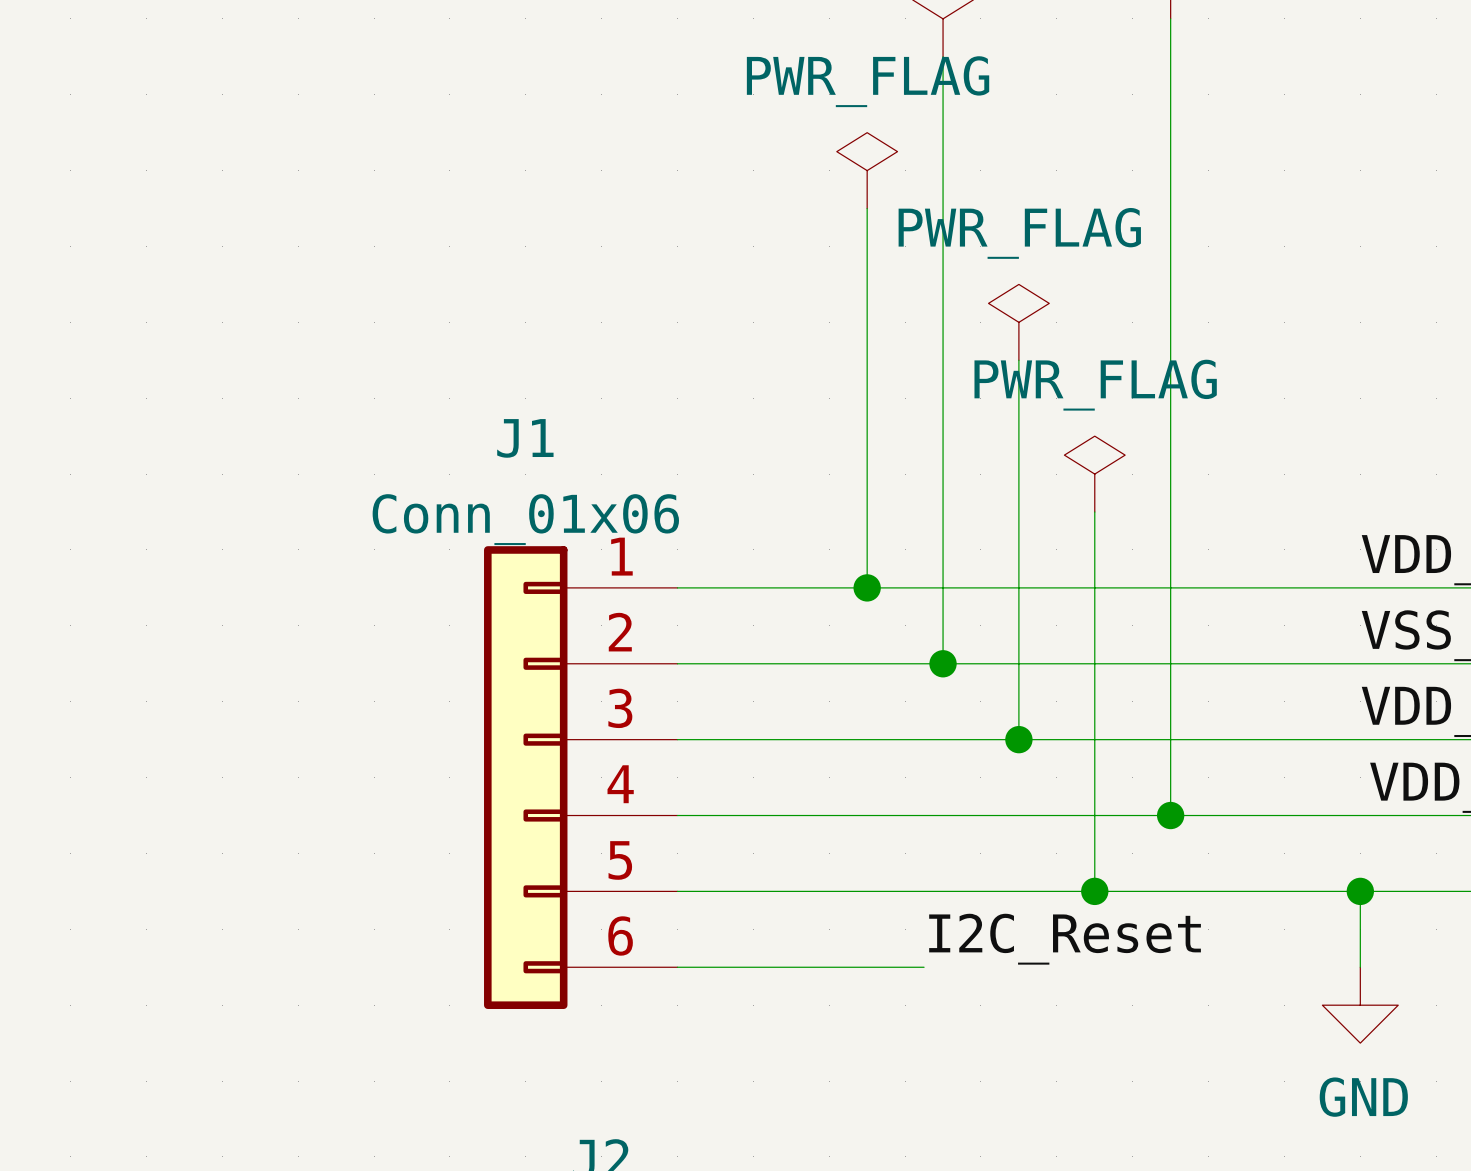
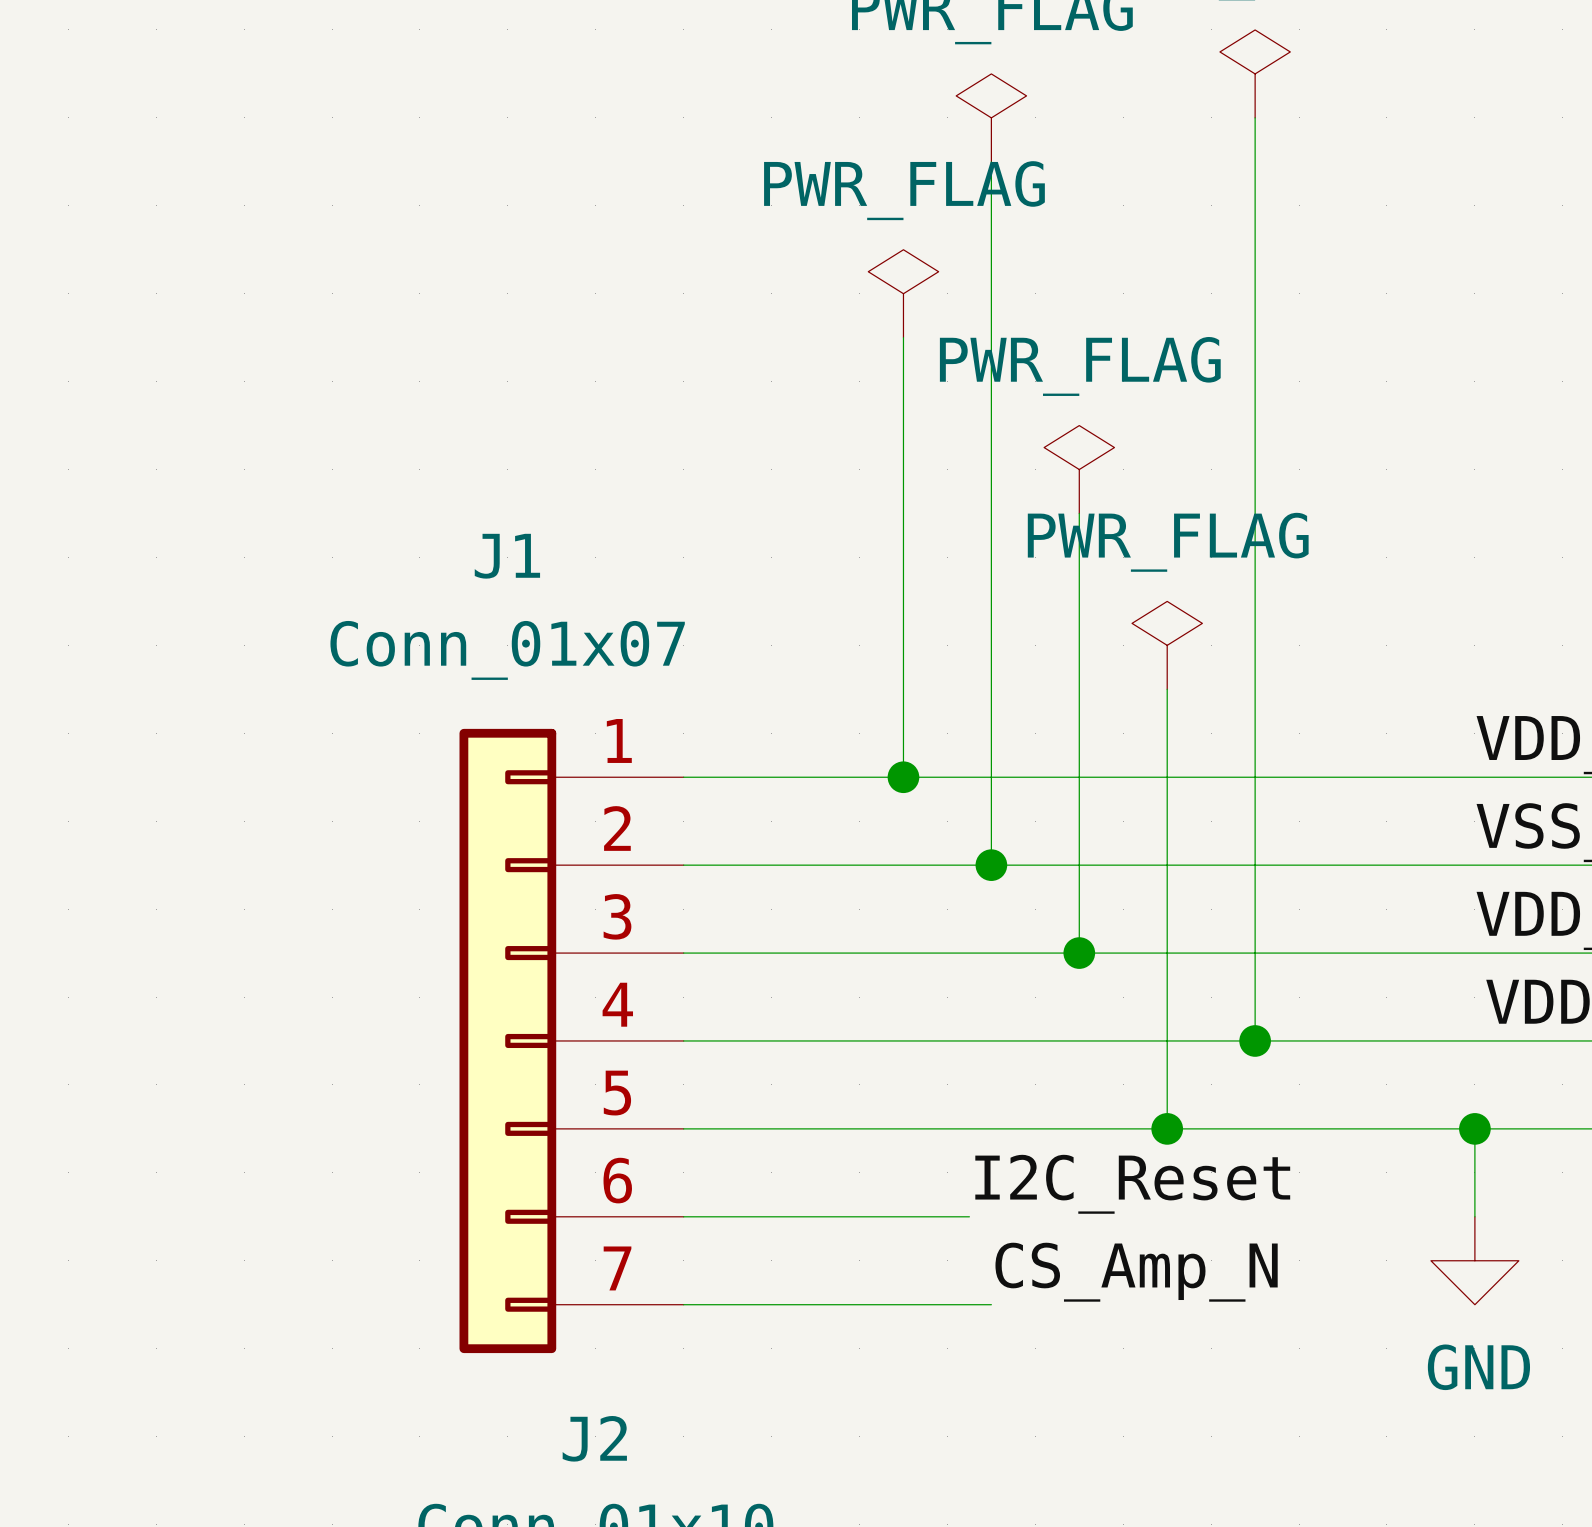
J1 name position: J1 (525, 438) -> J1 (507, 556)
J1 value: Conn_01x06 (525, 519) -> Conn_01x07 (507, 650)
J1 symbol: [484, 546, 678, 1009] -> [459, 728, 684, 1354]
label: none -> CS_Amp_N (1136, 1272)
wire: none -> (683, 1304) (991, 1304)

